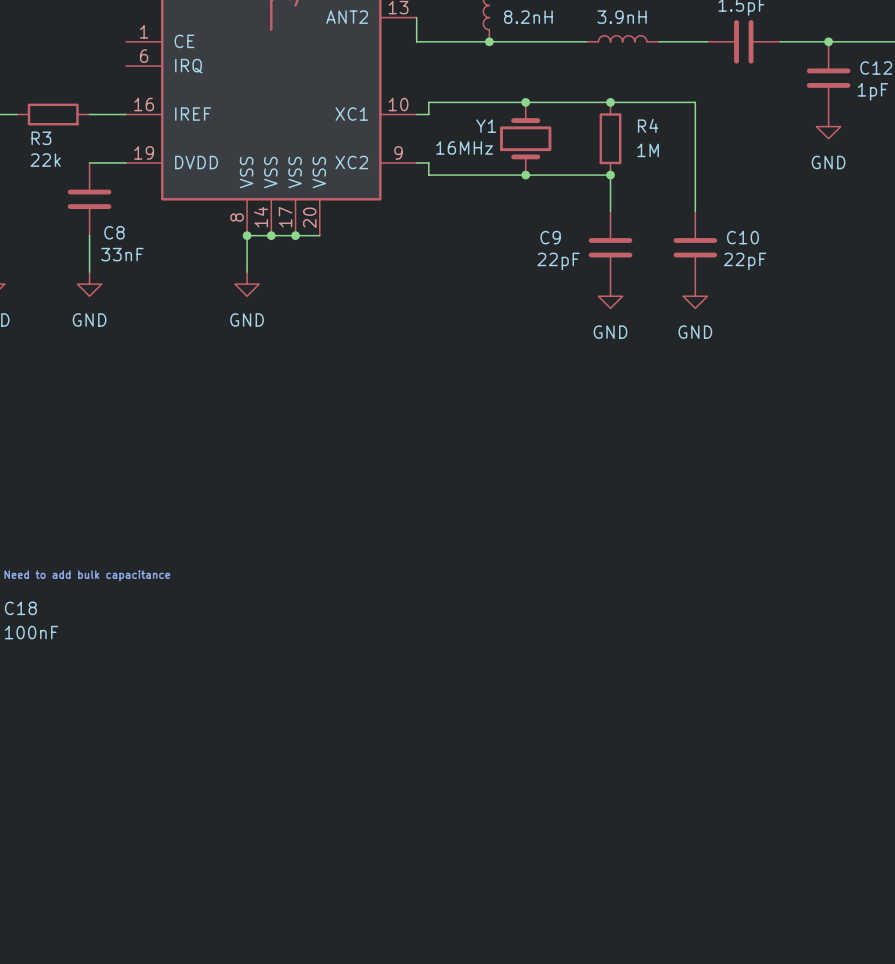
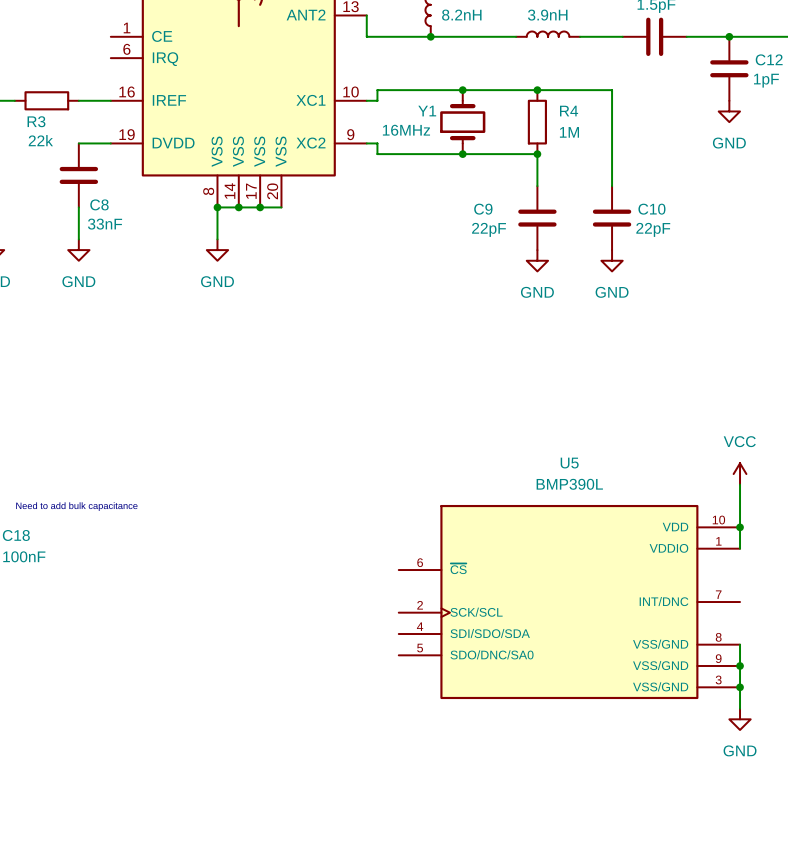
power symbol: none -> VCC (740, 474)
wire: none -> (740, 484) (740, 548)
junction: none -> (740, 527)
U5: none -> BMP390L (569, 602)
wire: none -> (740, 644) (740, 708)
junction: none -> (740, 665)
junction: none -> (740, 687)
power symbol: none -> GND (740, 719)

